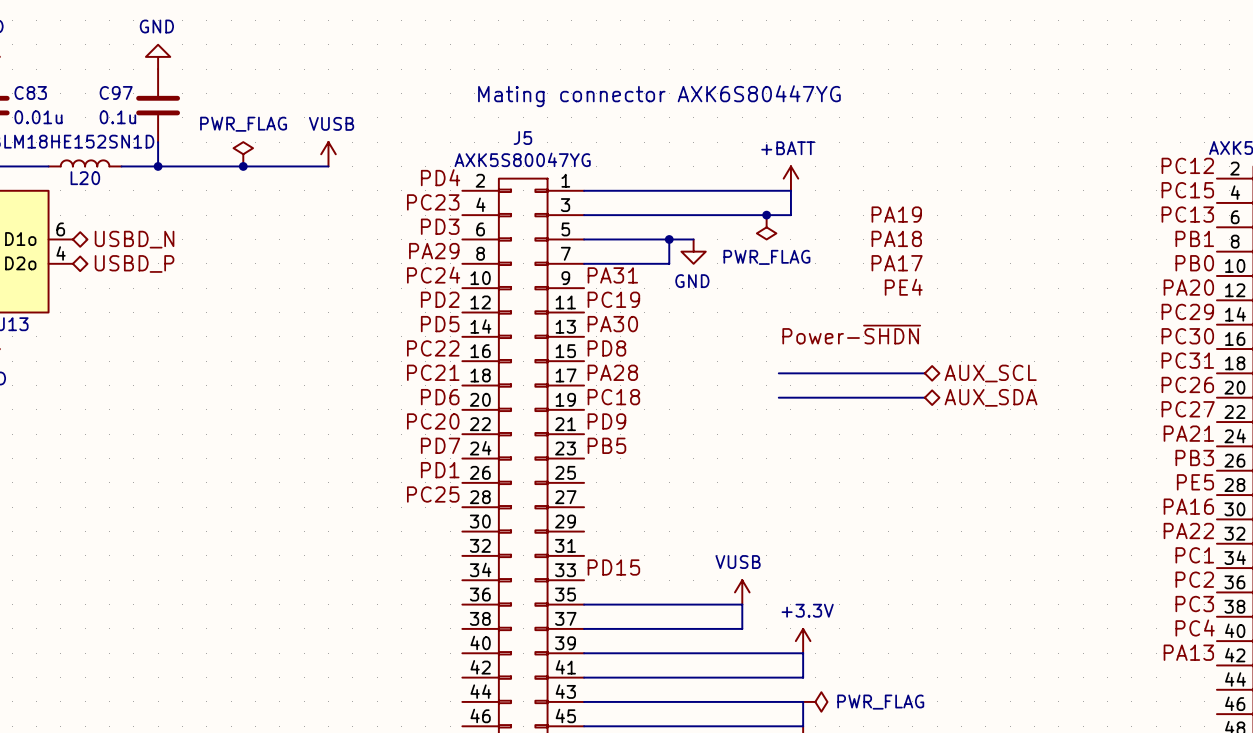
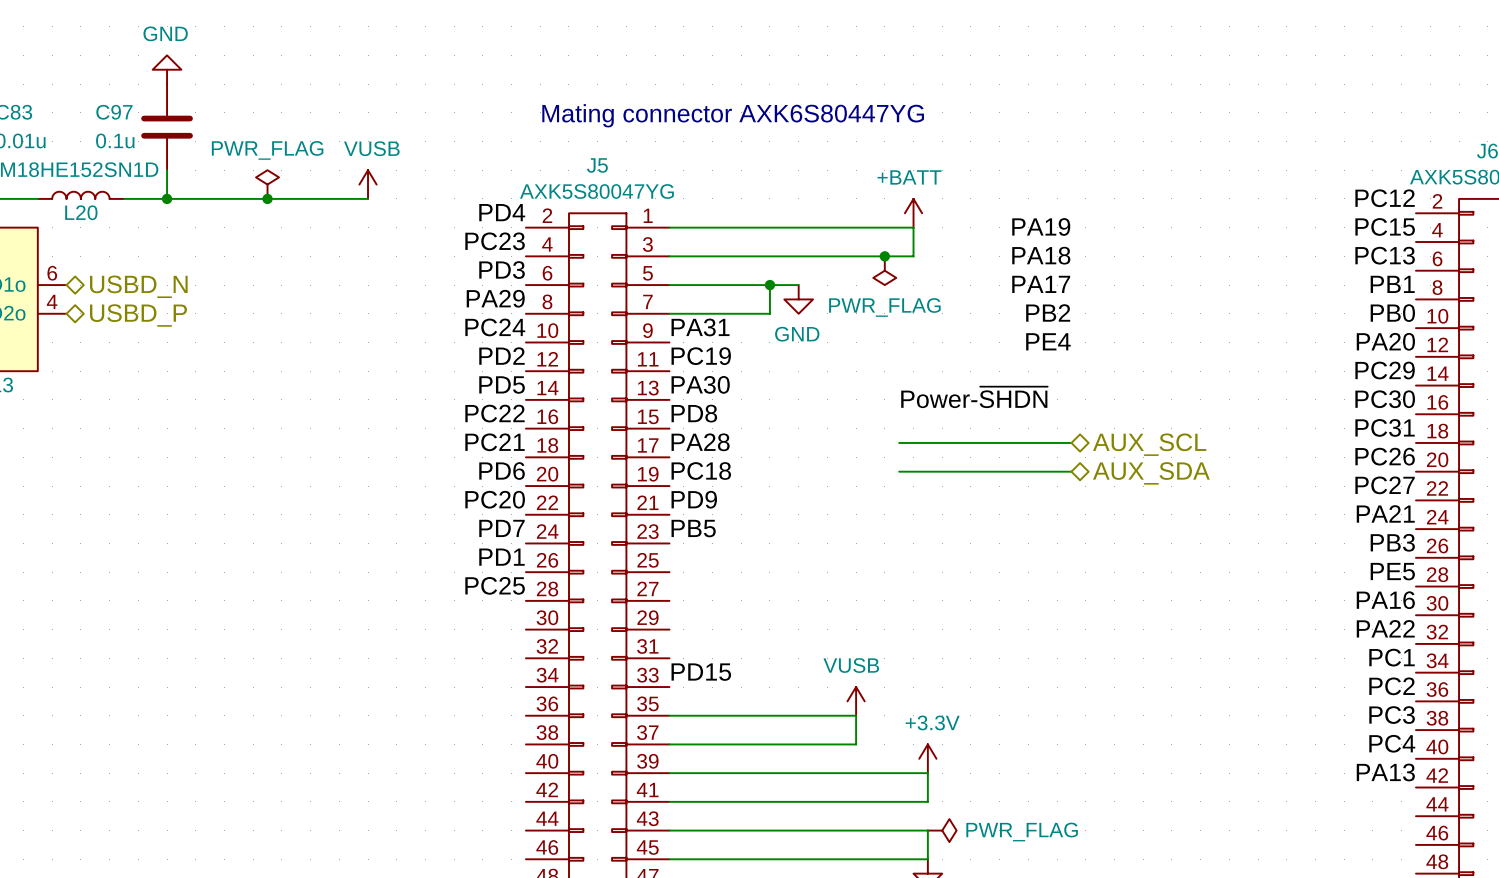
label: none -> PA19 (1041, 226)
label: PA19 (896, 214) -> PA18 (1041, 255)
label: PA18 (896, 238) -> PA17 (1041, 284)
label: PA17 (897, 263) -> PB2 (1048, 312)

